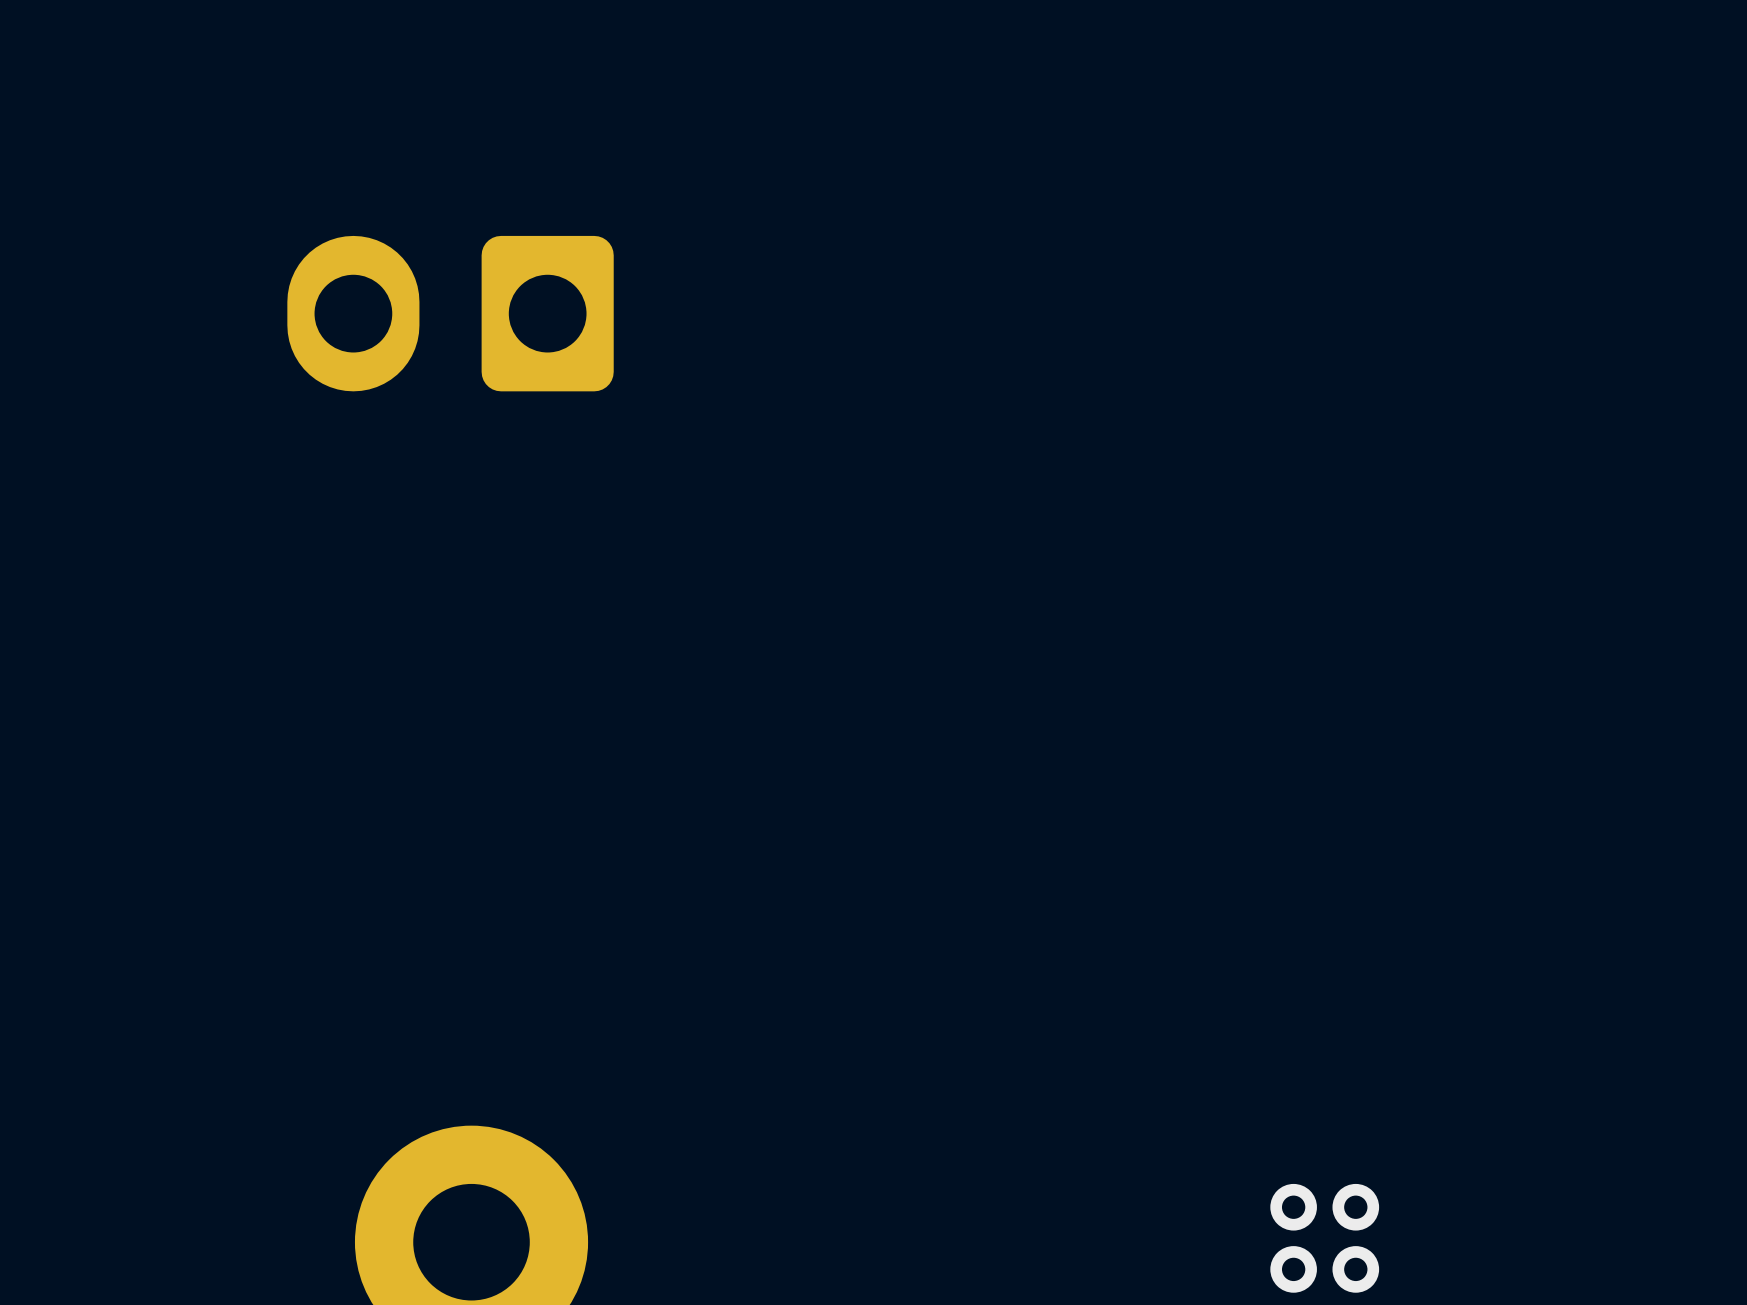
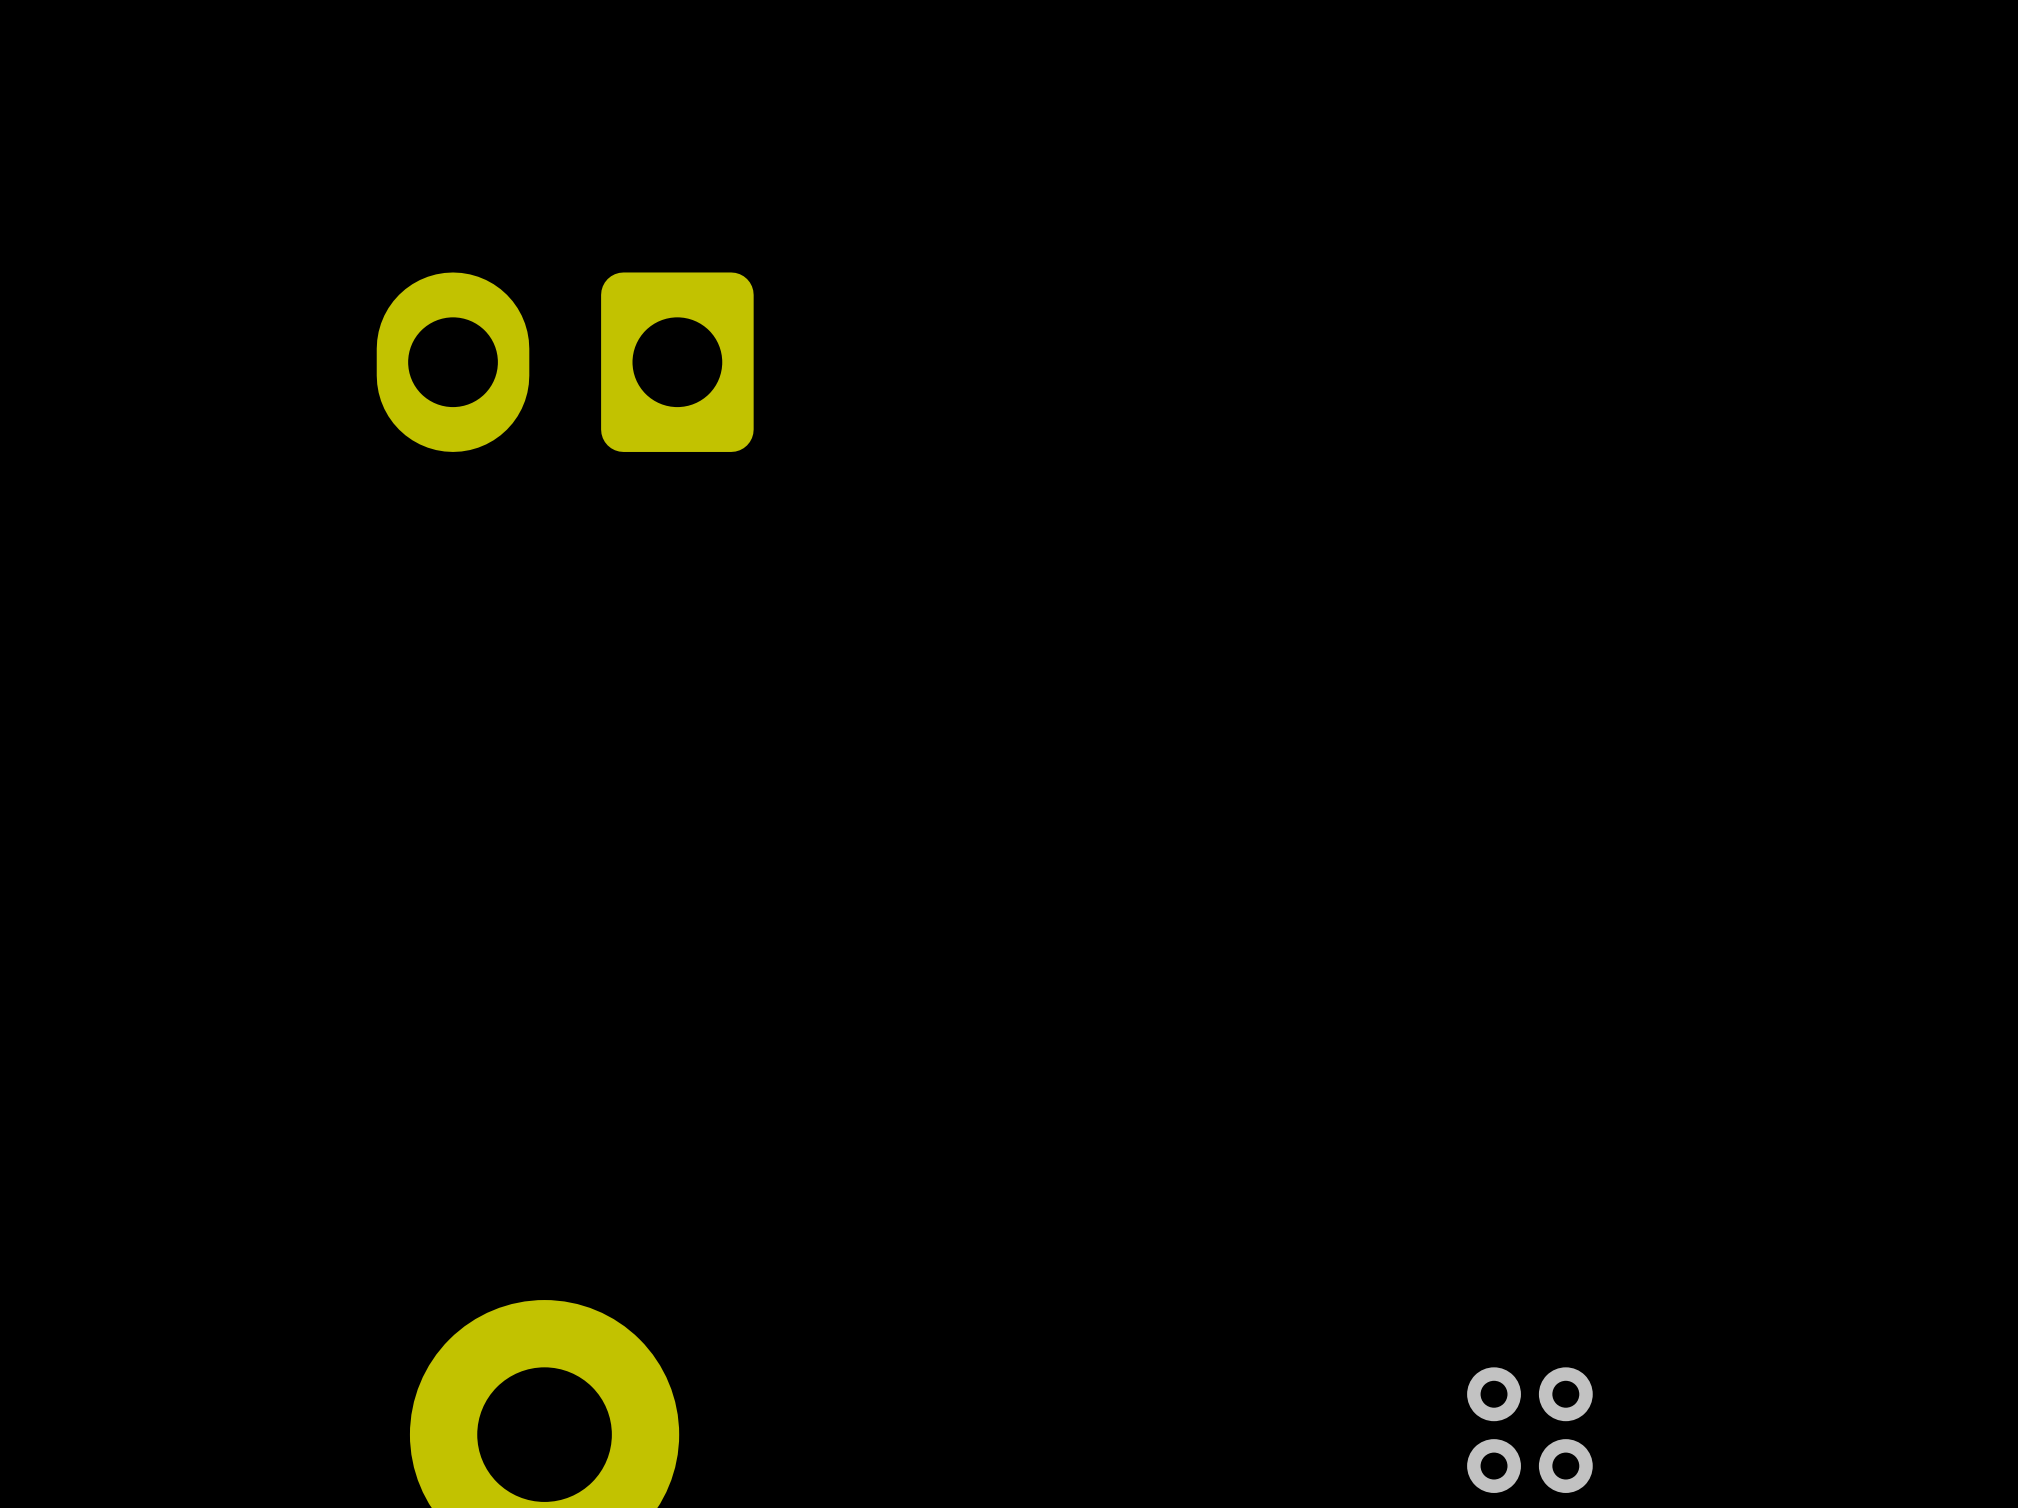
part position: (450, 313) -> (565, 362)

